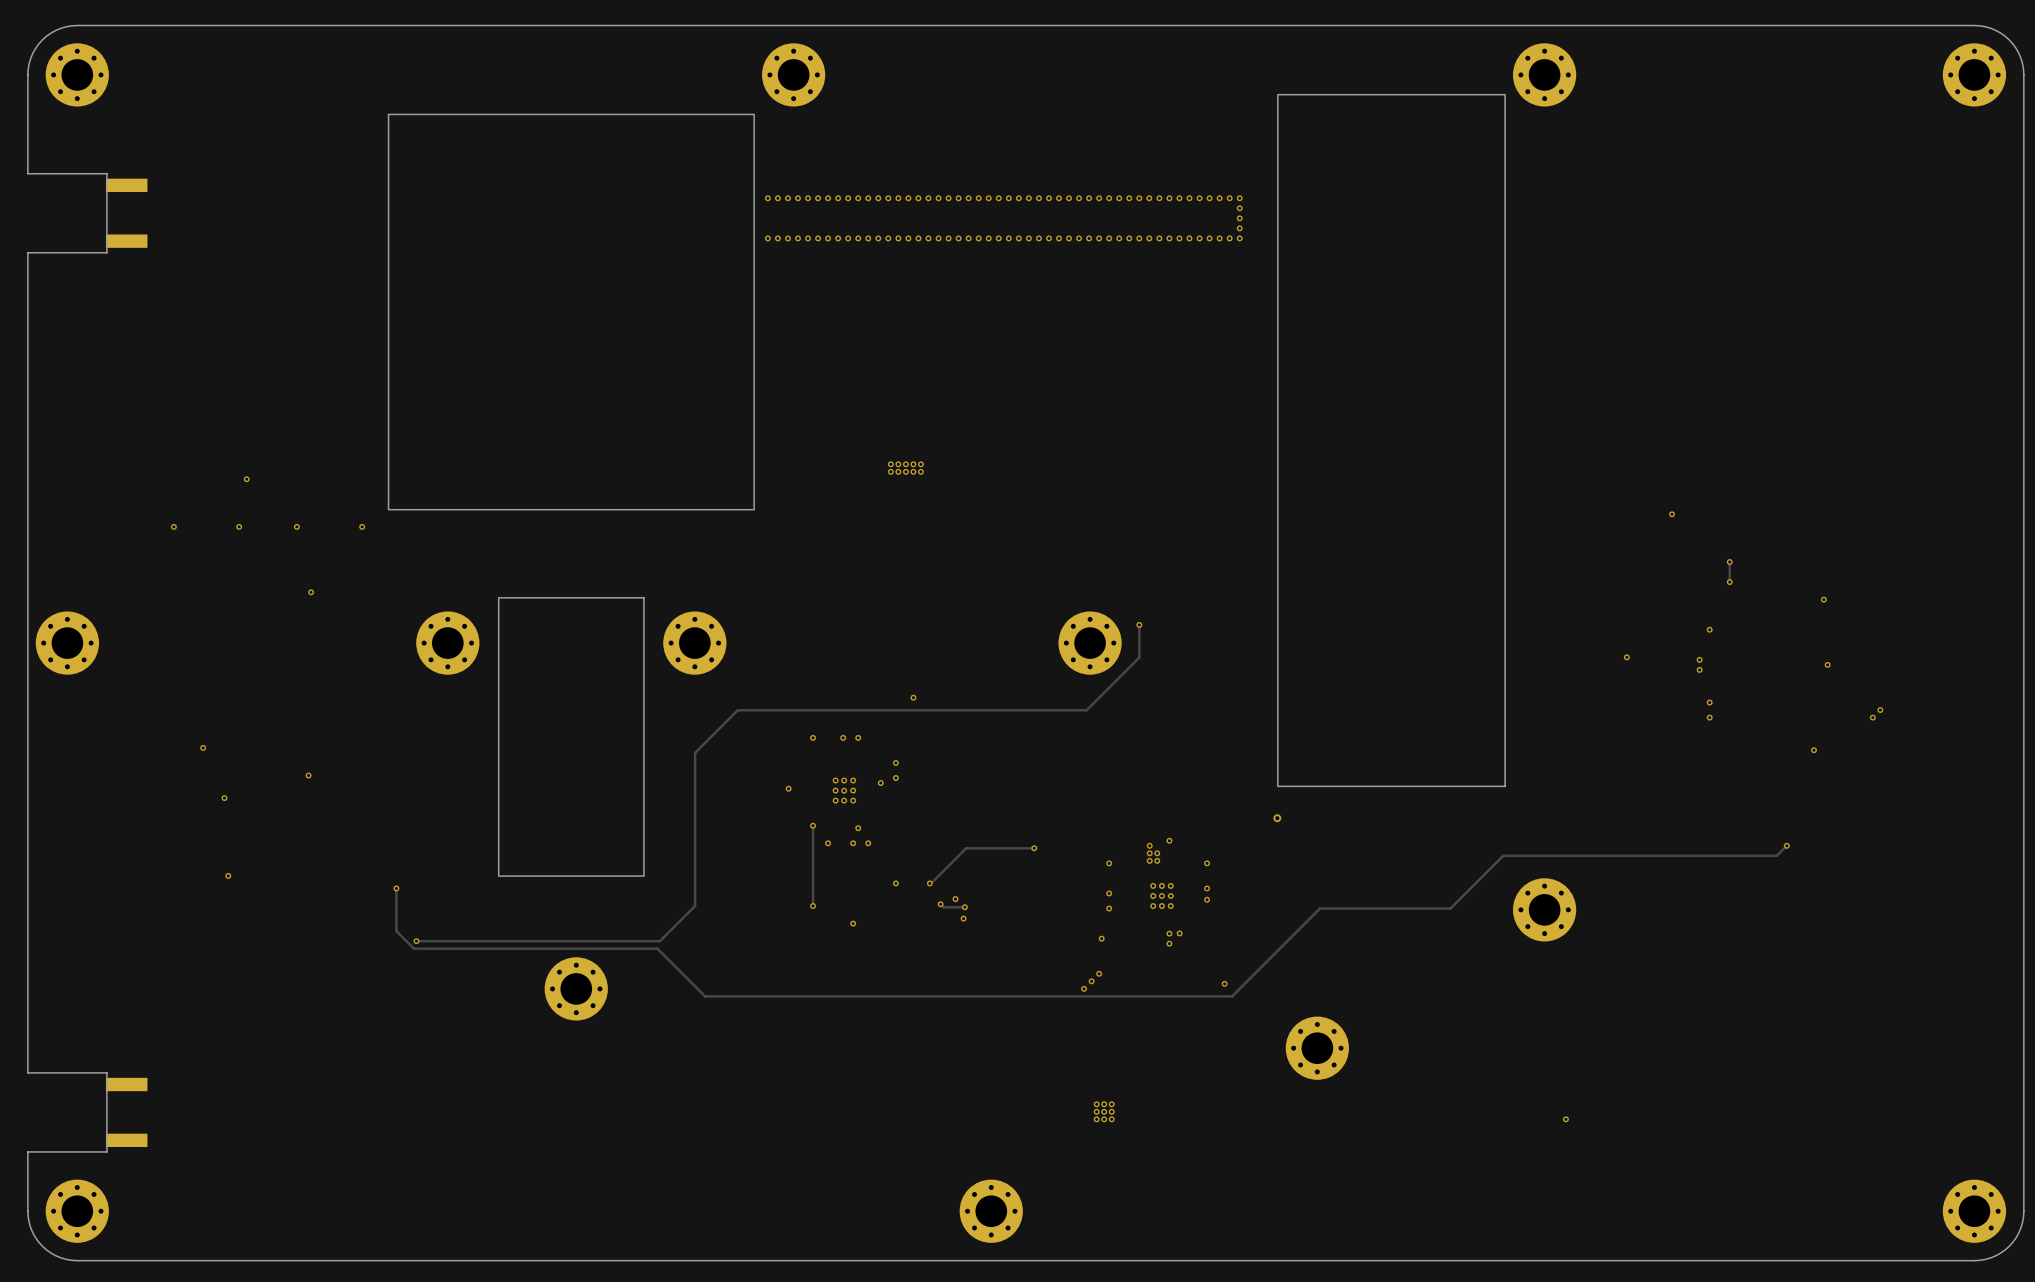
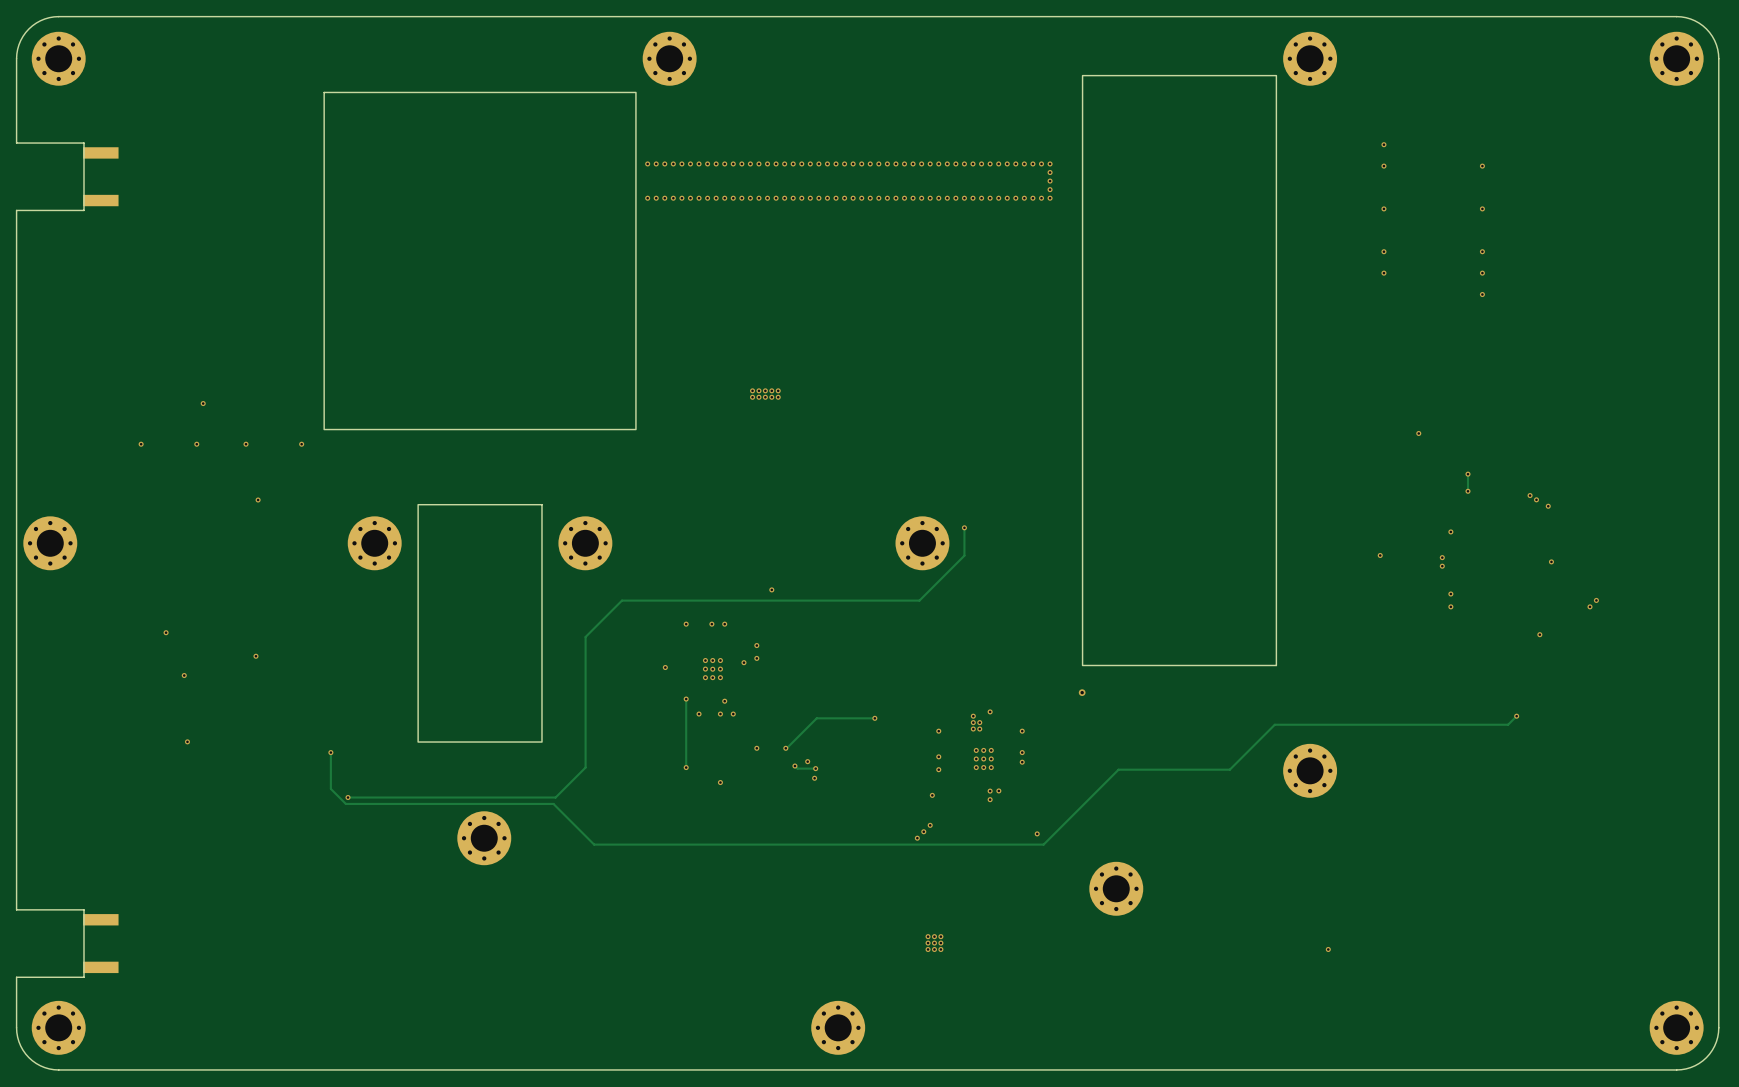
via: none -> (1383, 144)
via: none -> (1383, 166)
via: none -> (1482, 166)
via: none -> (1383, 208)
via: none -> (1482, 208)
via: none -> (1383, 251)
via: none -> (1482, 251)
via: none -> (1383, 273)
via: none -> (1482, 273)
via: none -> (1482, 294)
via: none -> (1530, 495)
via: none -> (1536, 499)

